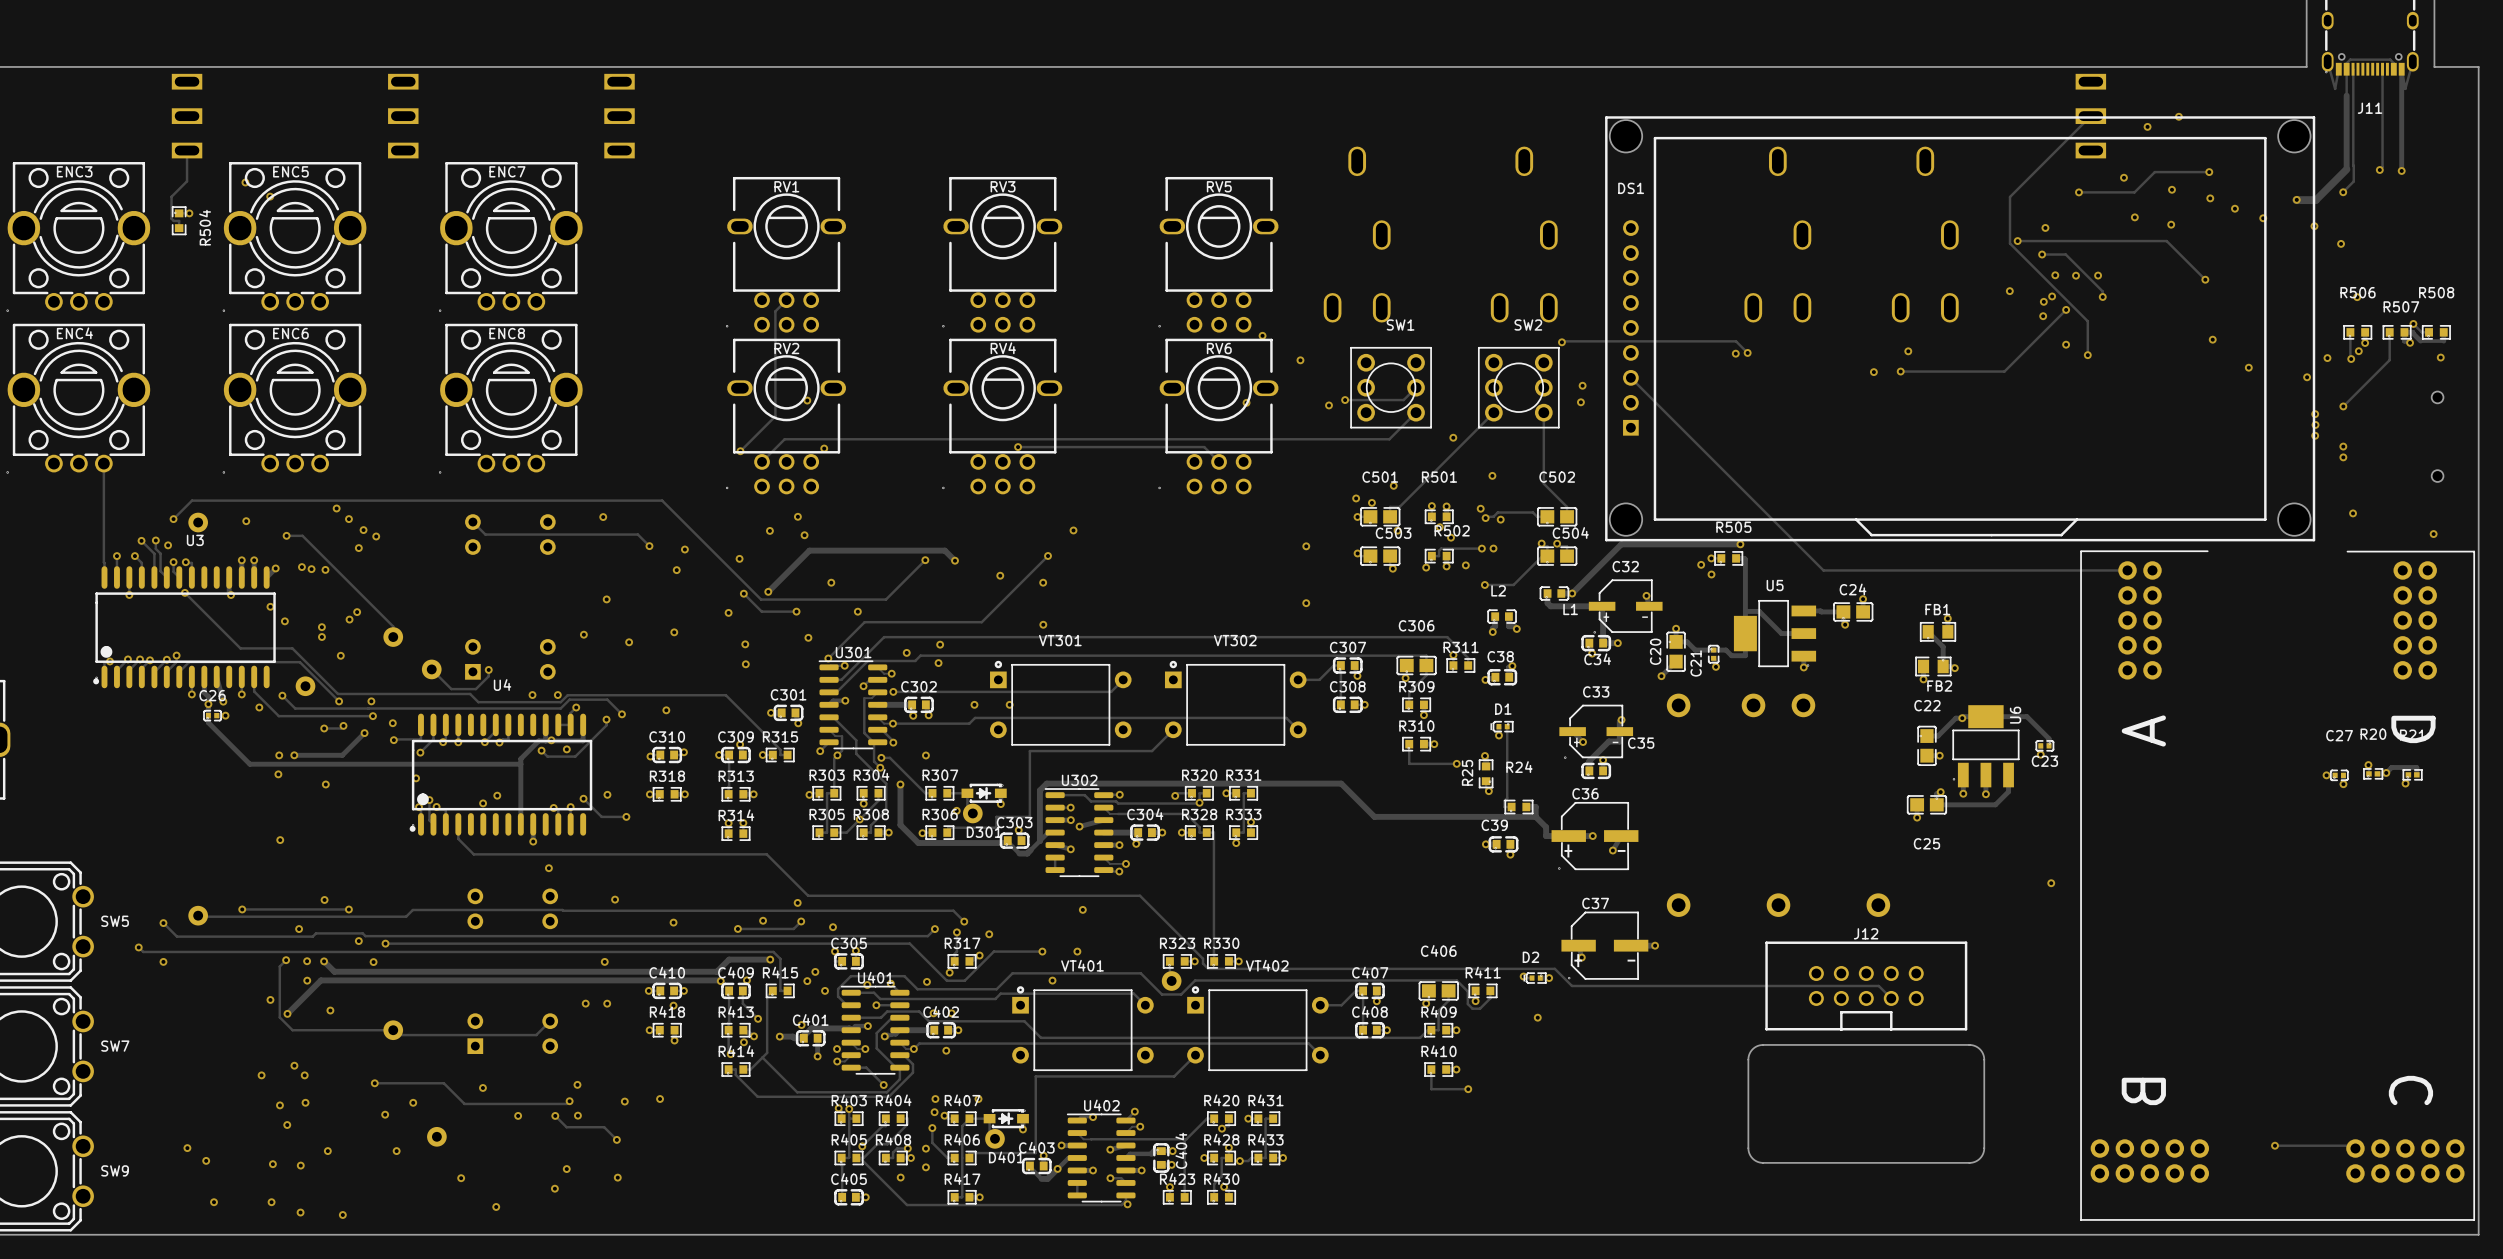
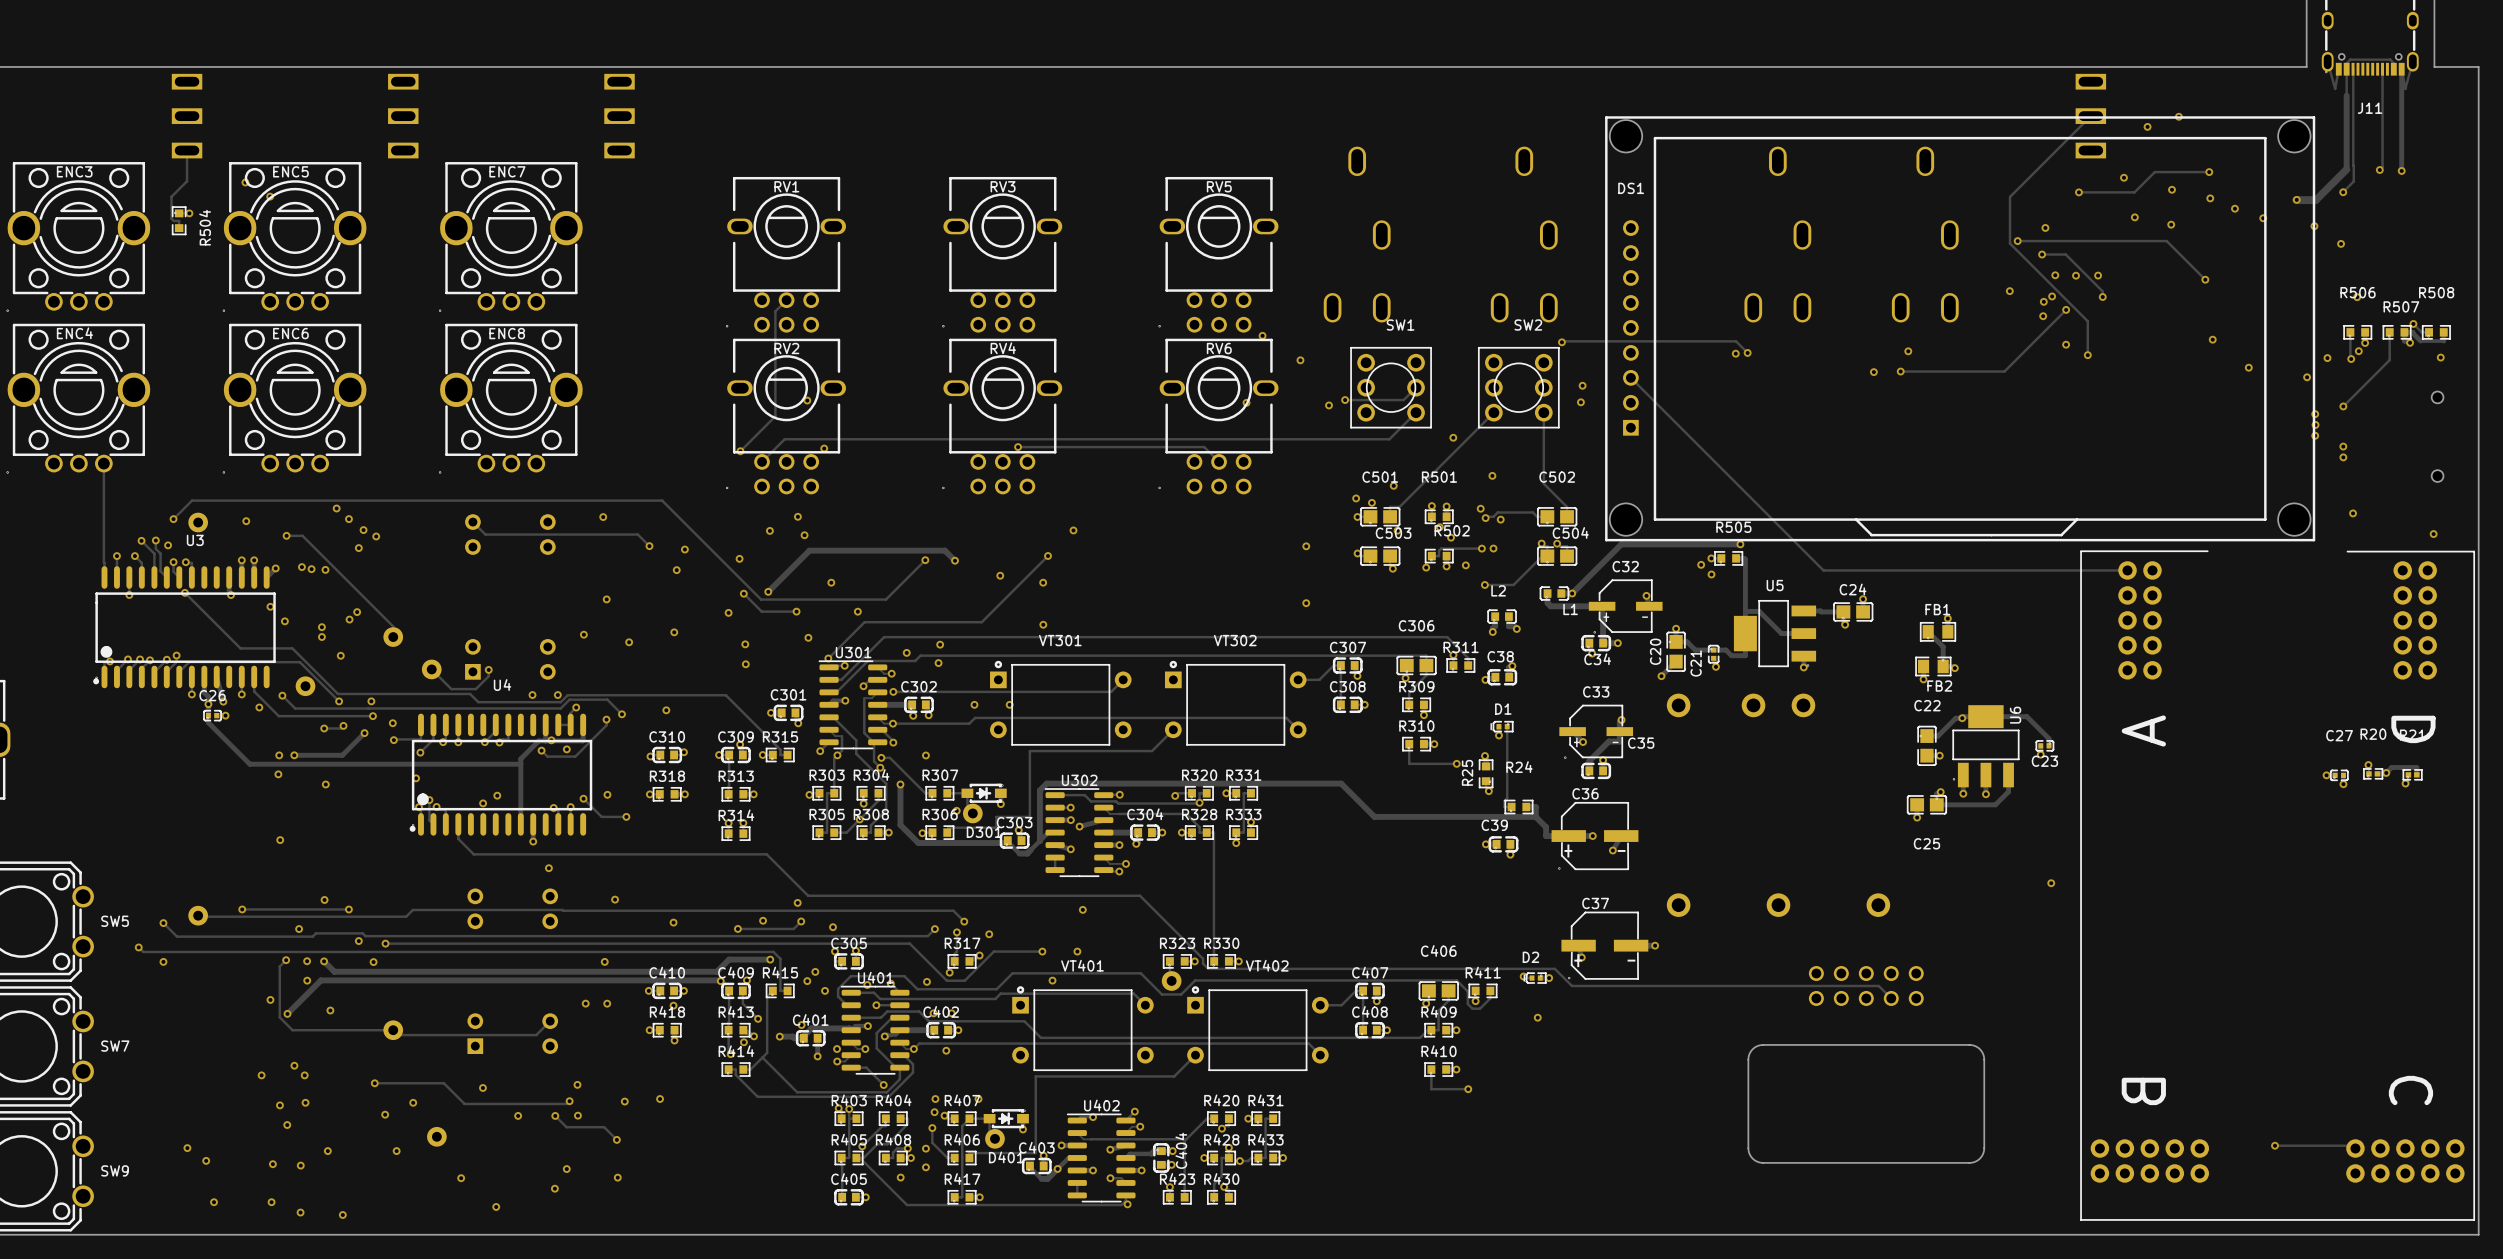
J12 side: top (1866, 986) -> bottom (1866, 985)

